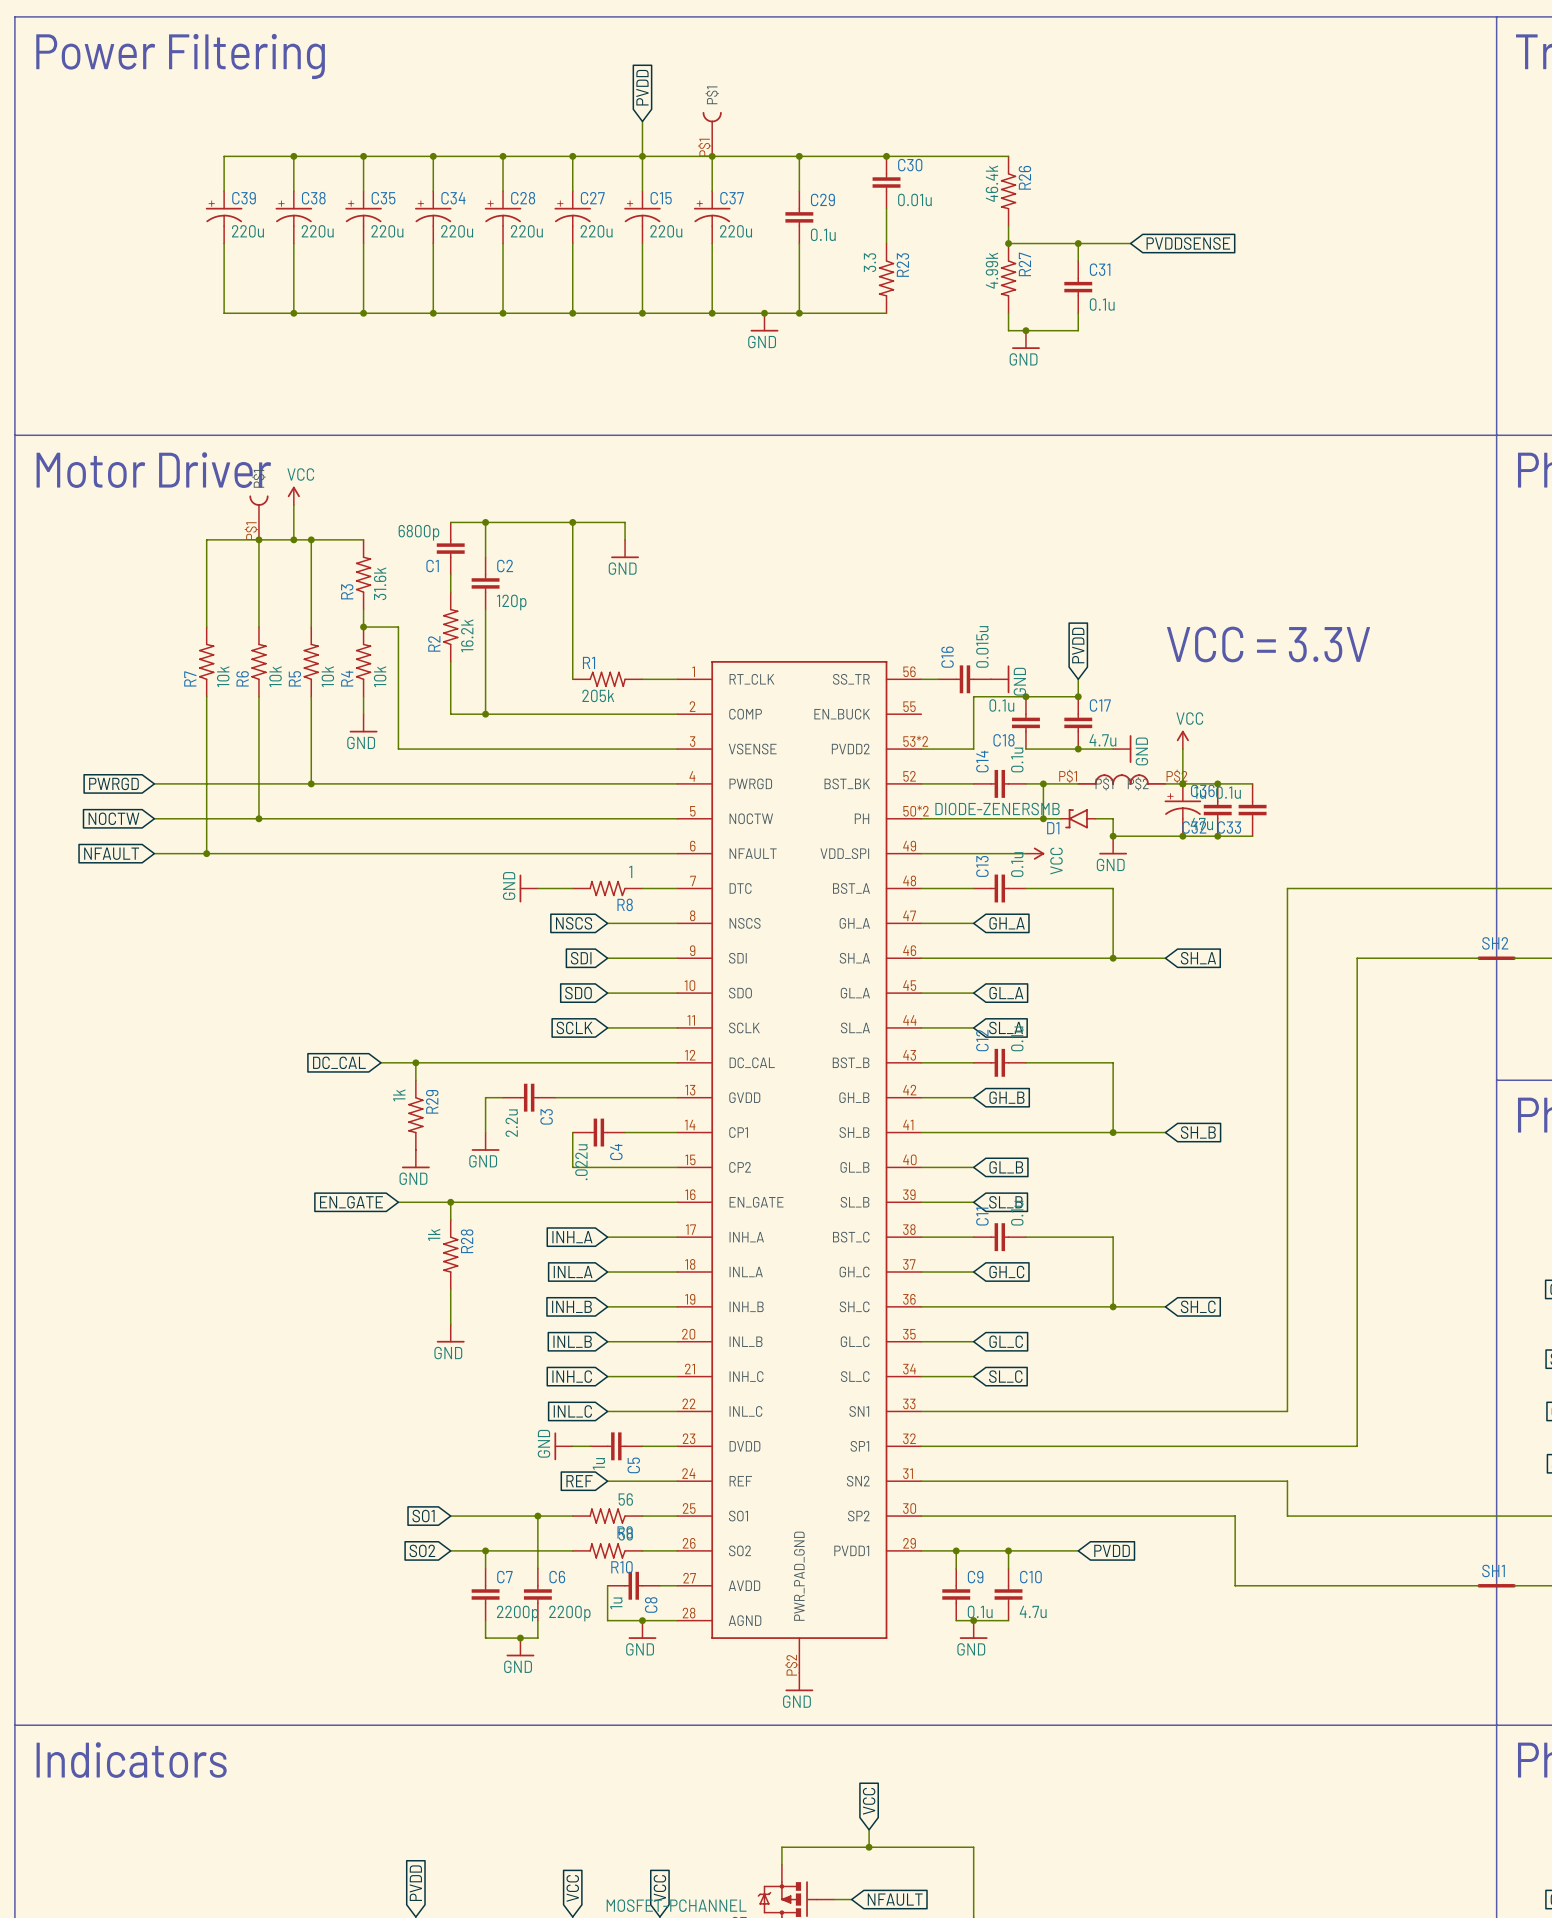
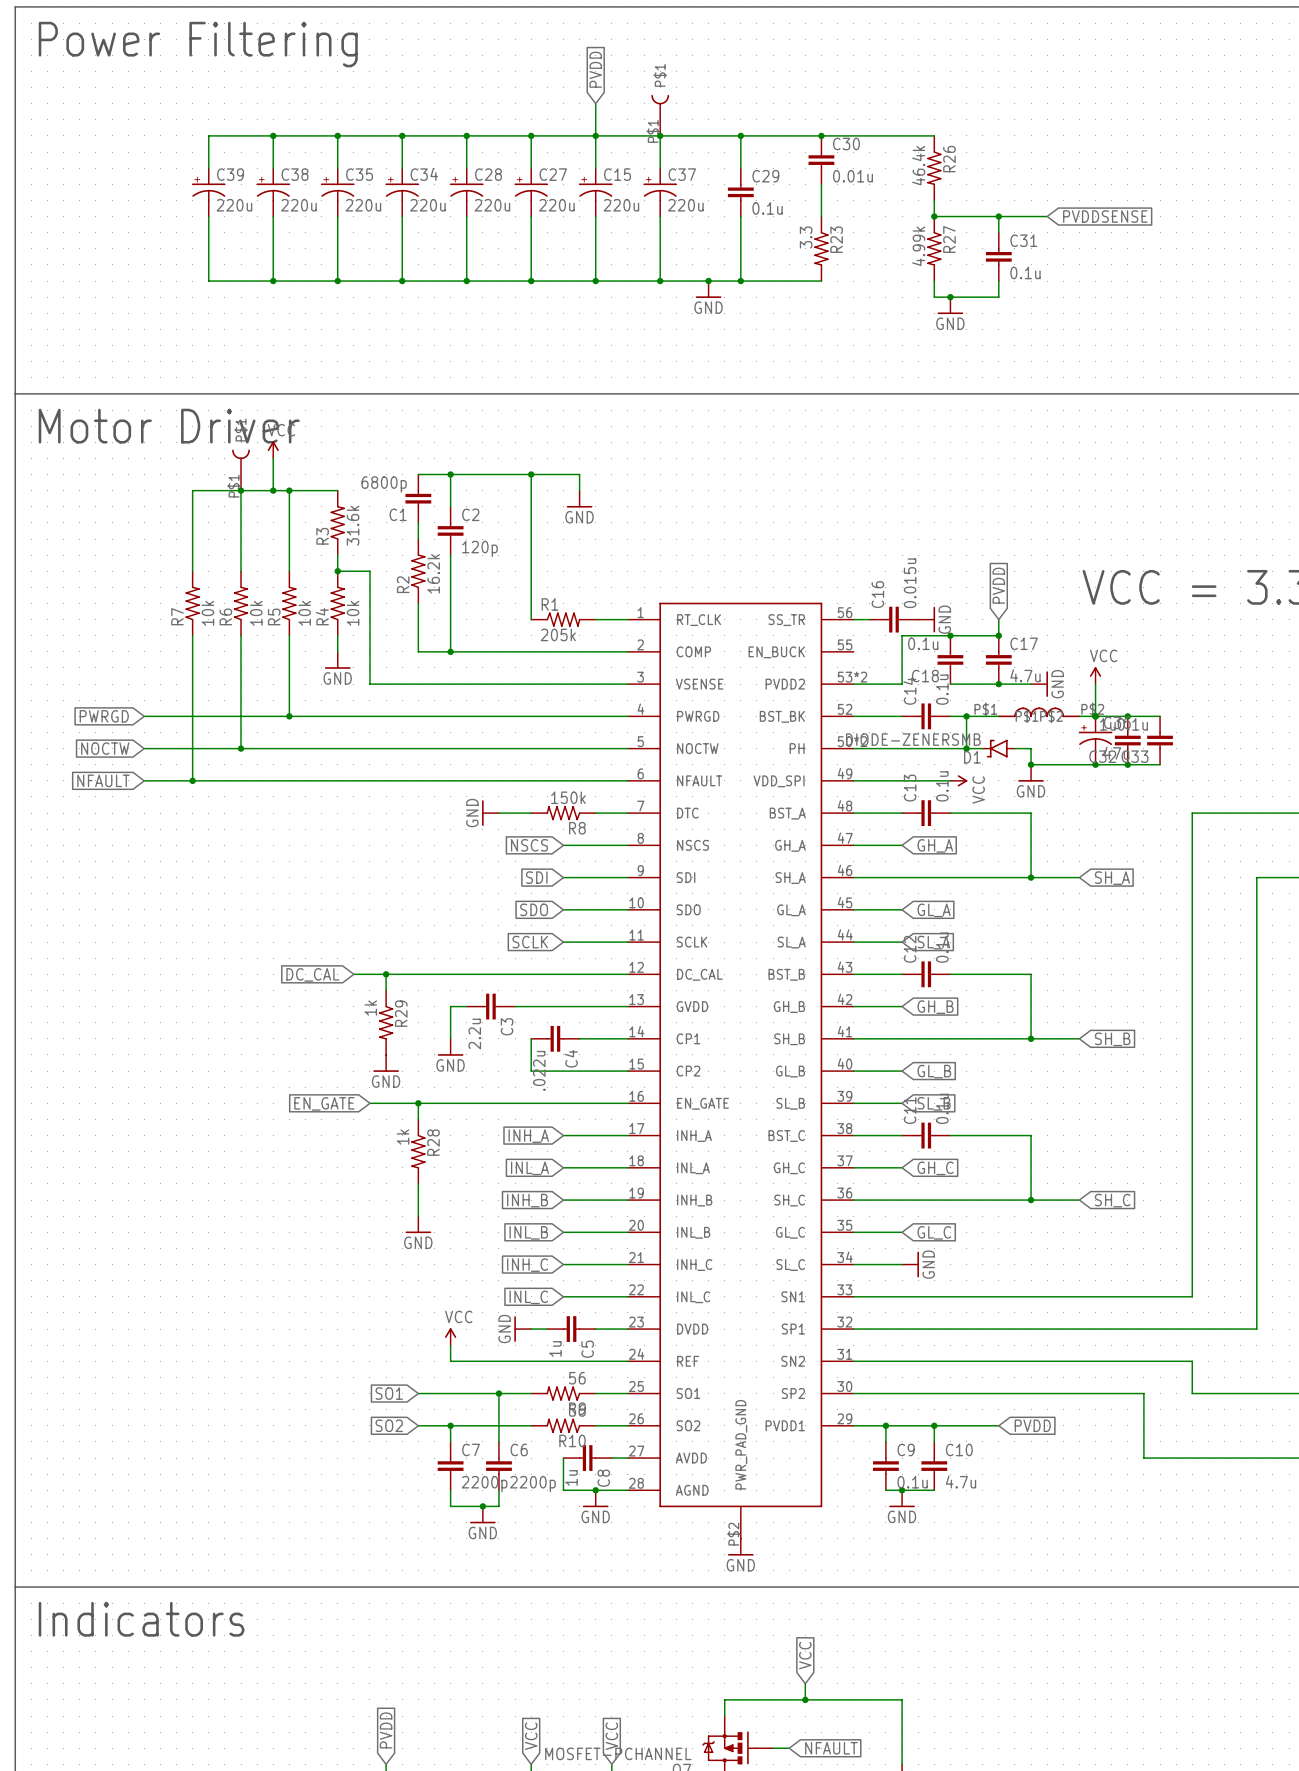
R8 value: 1 (630, 871) -> 150k (568, 797)
power symbol: none -> GND (910, 1264)
global label: SL_C (1005, 1376) -> none
power symbol: none -> VCC (450, 1336)
wire: none -> (450, 1345) (450, 1361) (563, 1361)
global label: REF (579, 1481) -> none

